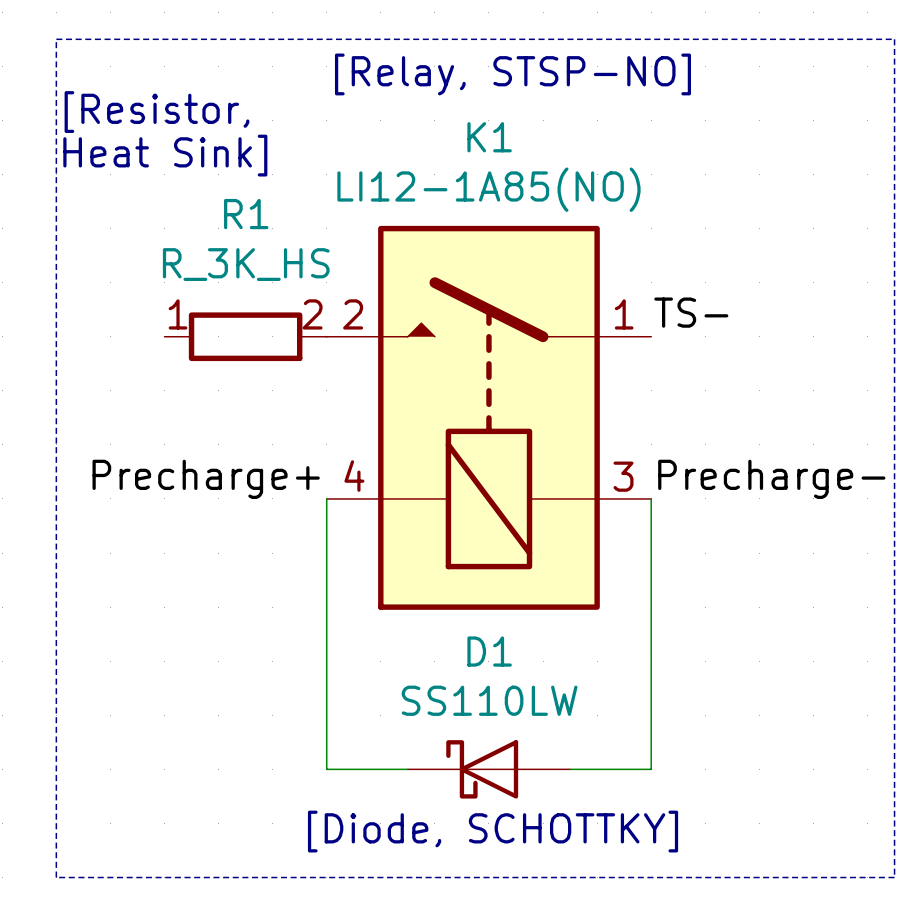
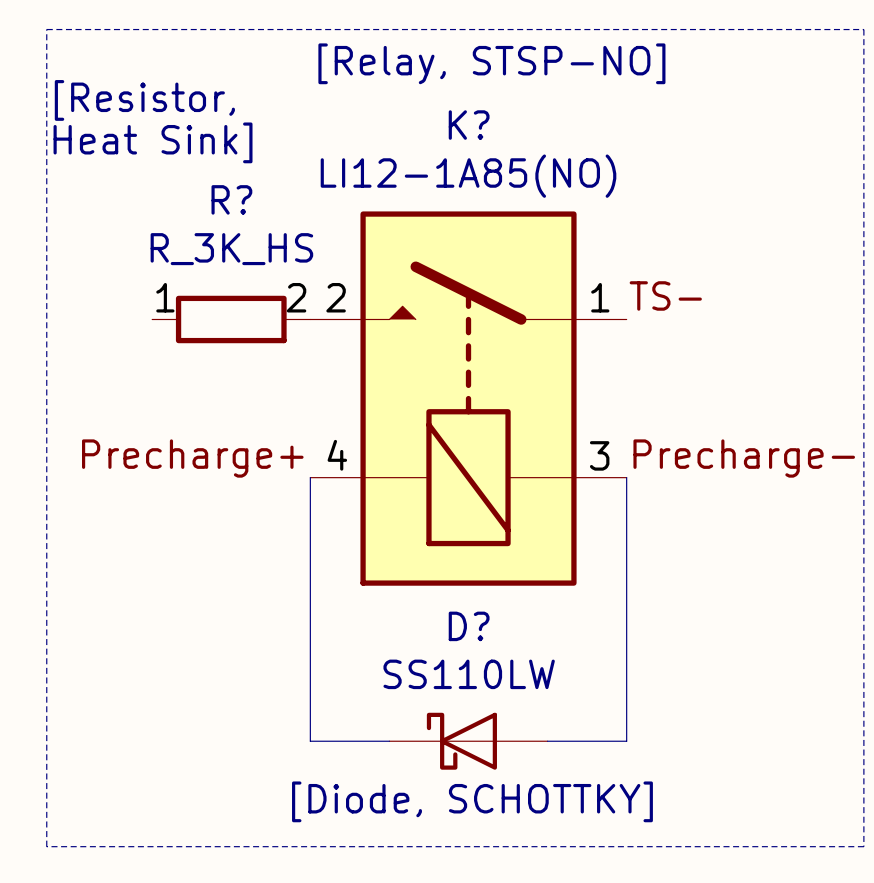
K1 name: K1 (489, 137) -> K? (469, 125)
R1 name: R1 (246, 214) -> R? (231, 199)
D1 name: D1 (489, 651) -> D? (469, 626)

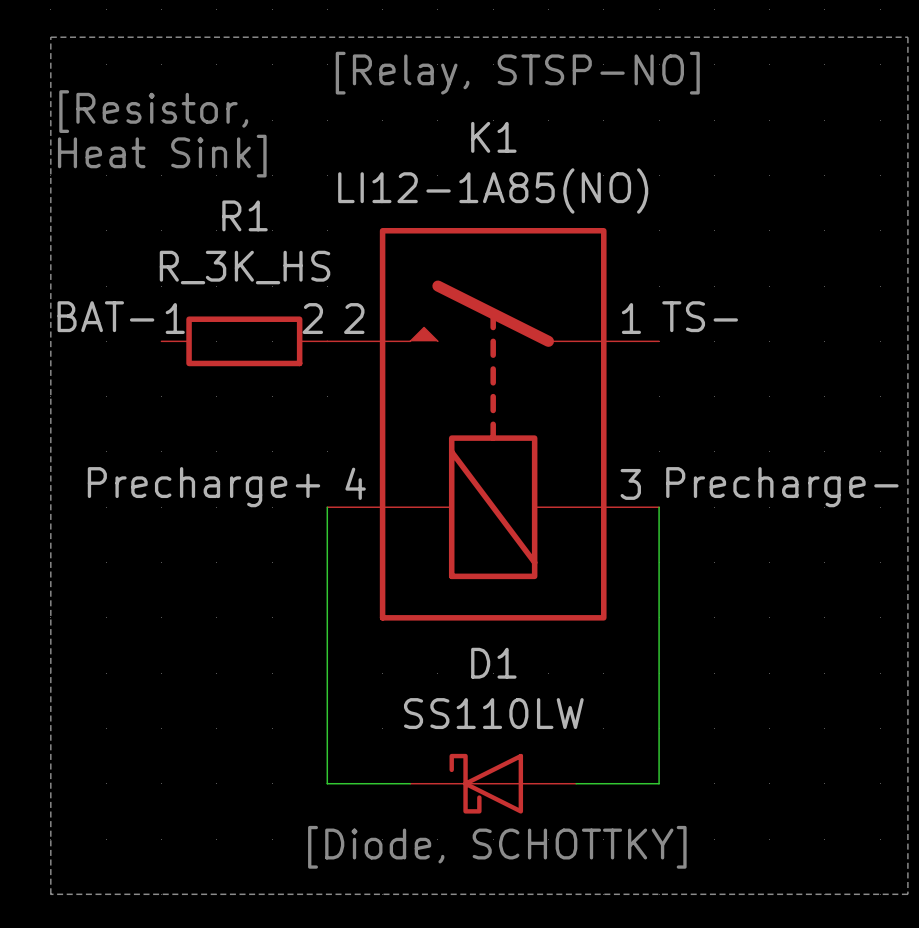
K? name: K? (469, 125) -> K1 (493, 137)
R? name: R? (231, 199) -> R1 (245, 215)
label: none -> BAT- (105, 316)
D? name: D? (469, 626) -> D1 (493, 663)

